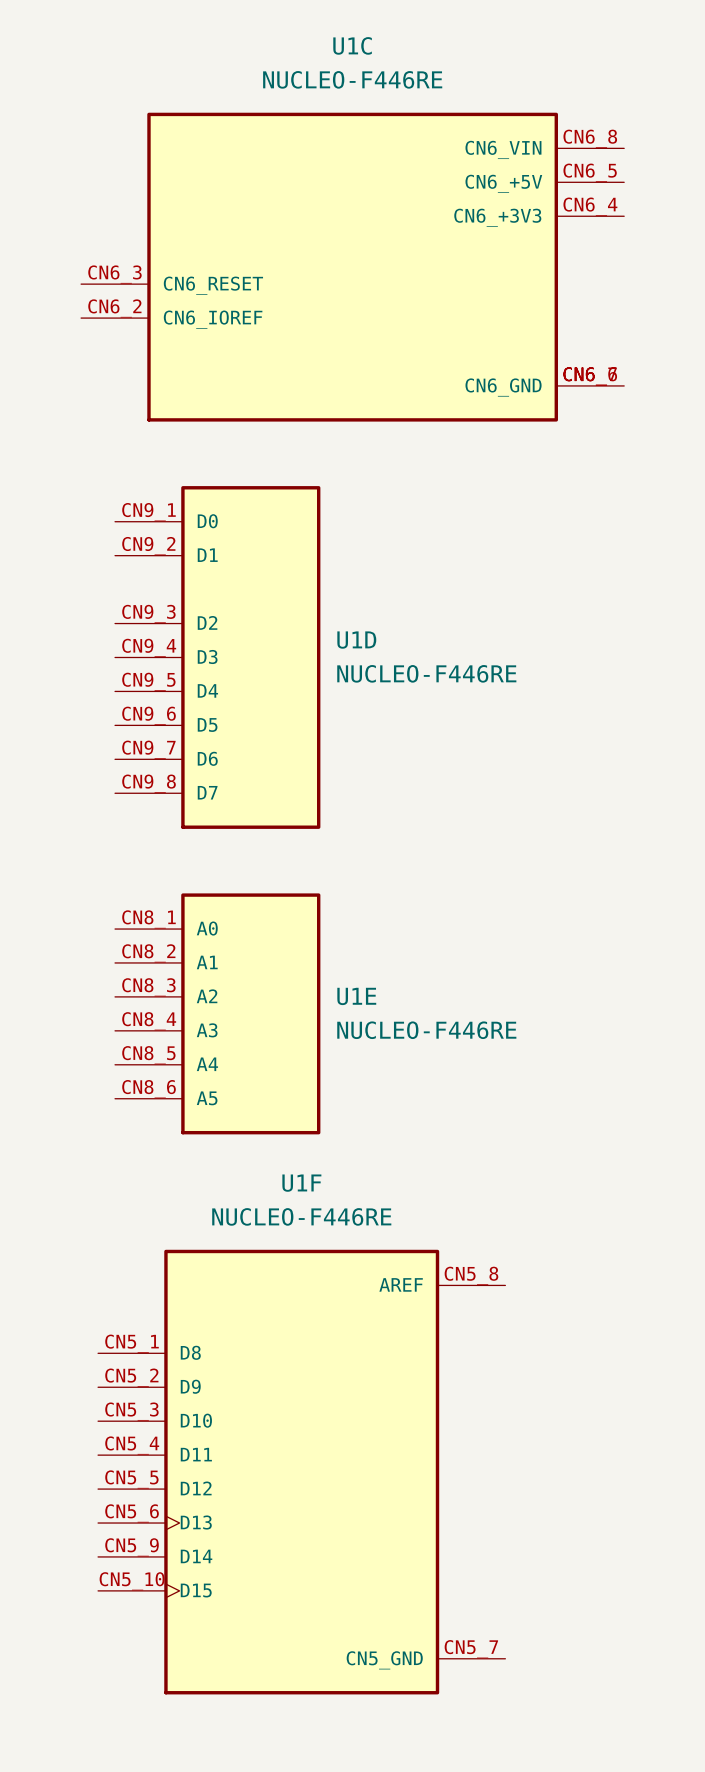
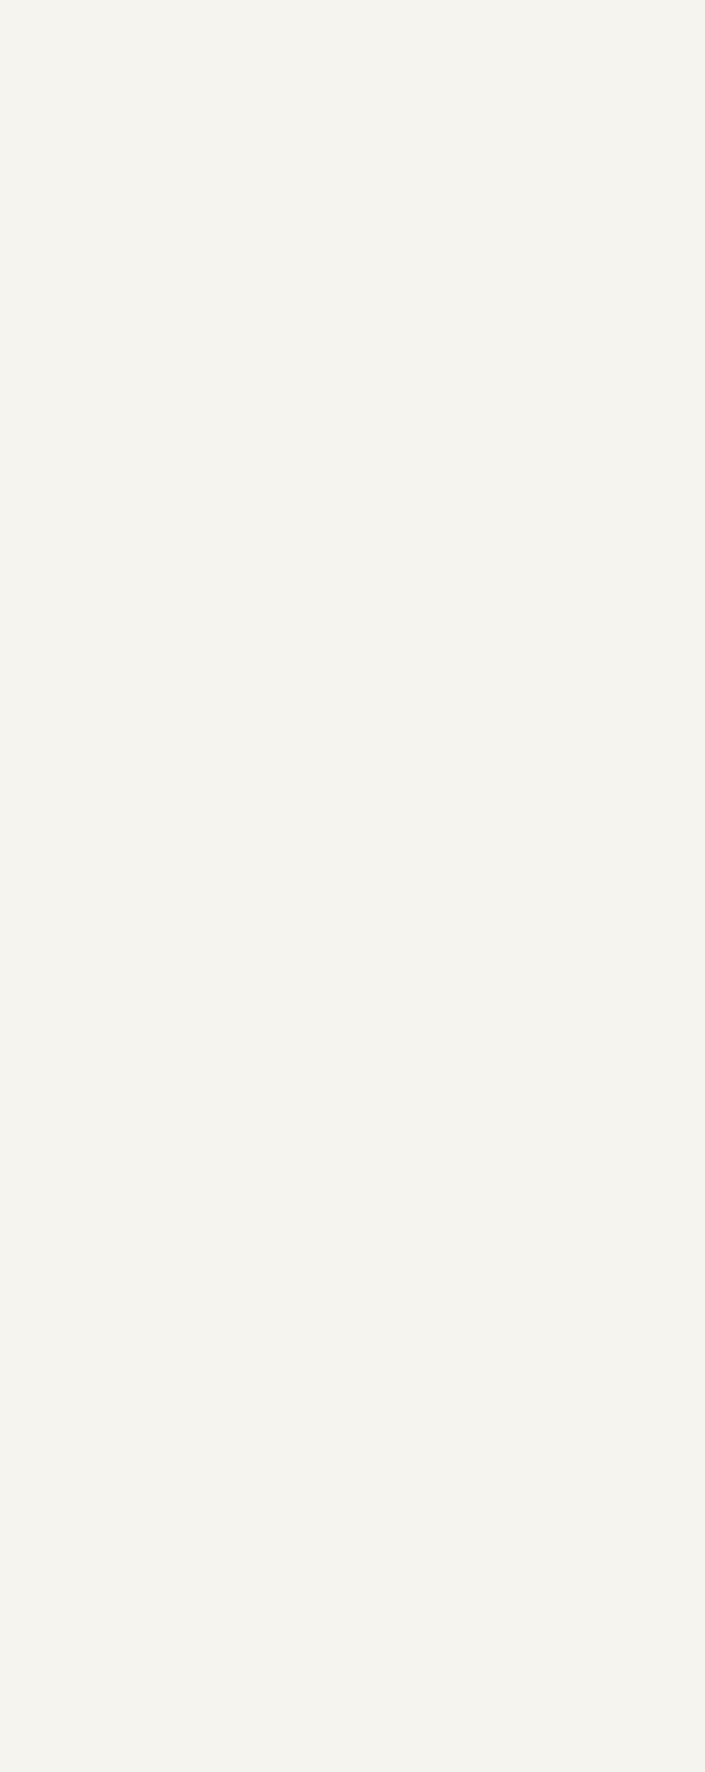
U1C: NUCLEO-F446RE (352, 267) -> none
U1D: NUCLEO-F446RE (217, 657) -> none
U1E: NUCLEO-F446RE (217, 1013) -> none
U1F: NUCLEO-F446RE (301, 1472) -> none

